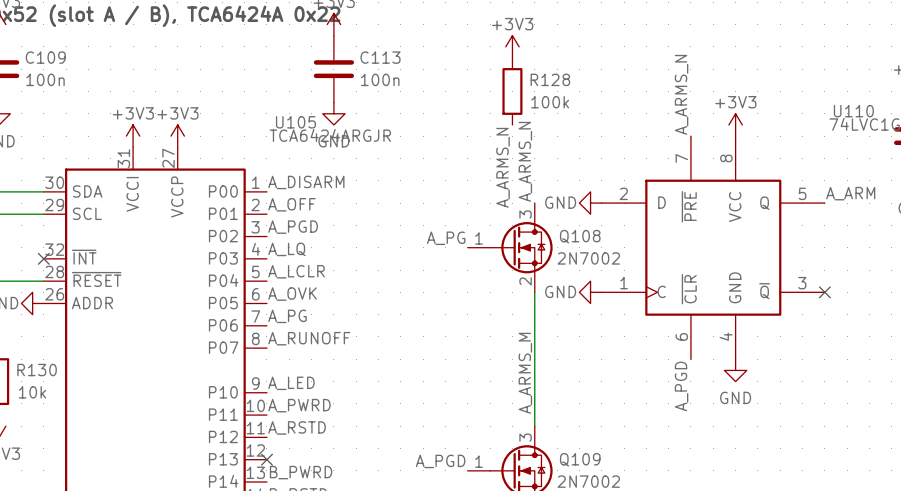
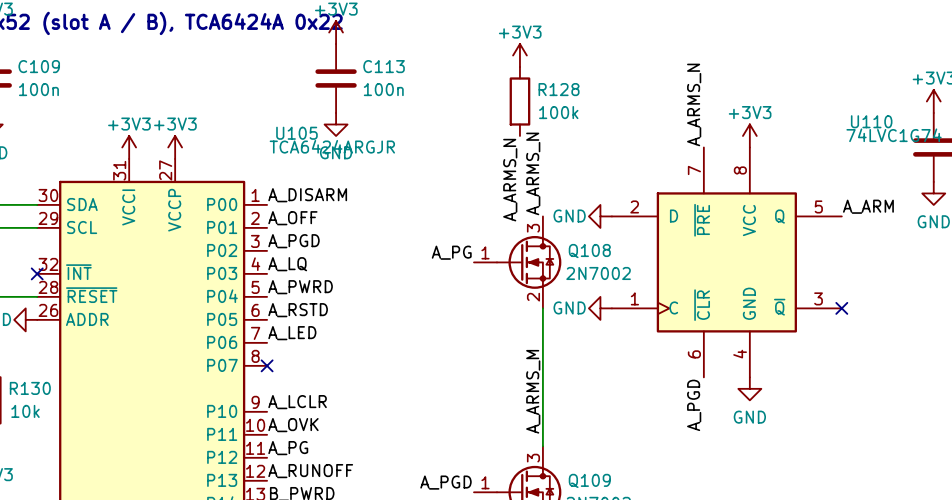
label: A_LCLR (296, 271) -> A_PWRD (300, 287)
label: A_OVK (292, 294) -> A_RSTD (298, 310)
label: A_PG (287, 316) -> A_LED (292, 333)
label position: A_RUNOFF (309, 338) -> A_RUNOFF (310, 471)
no-connect mark: none -> (267, 365)
label: A_LED (291, 383) -> A_LCLR (297, 402)
label: A_PWRD (299, 405) -> A_OVK (293, 425)
label: A_RSTD (297, 427) -> A_PG (288, 448)
no-connect mark: (266, 459) -> none

